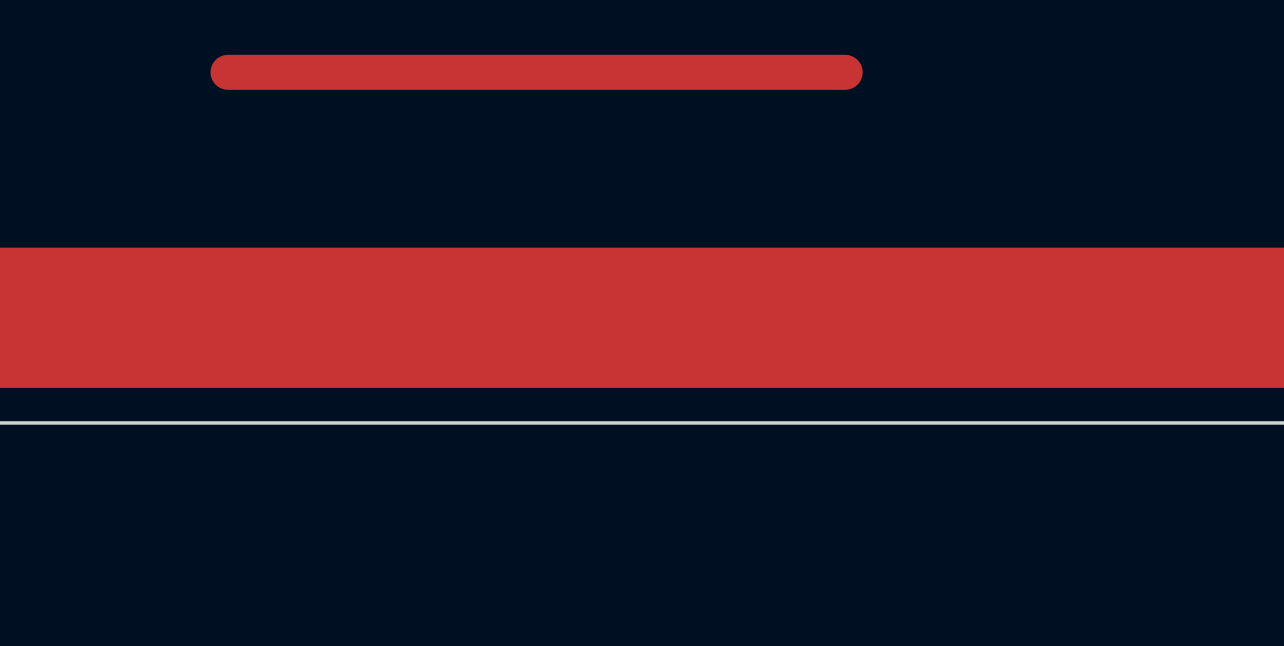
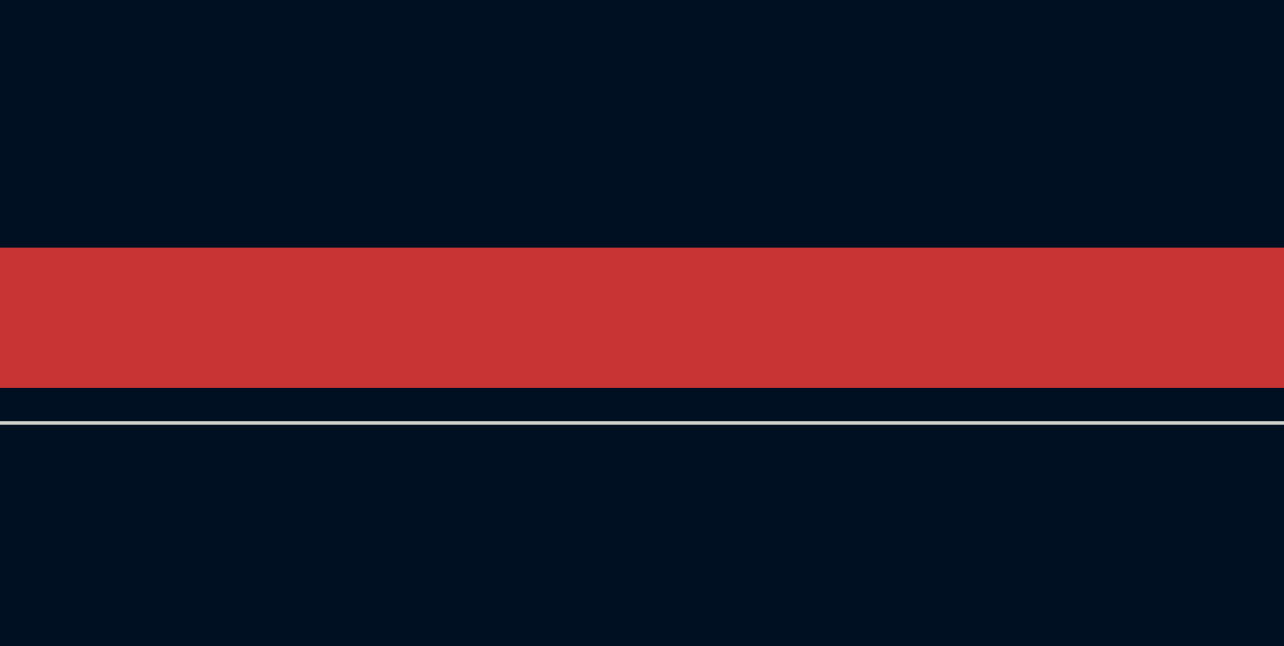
track: (262, 78) (256, 72) (227, 72) (845, 72) (851, 78) -> none

